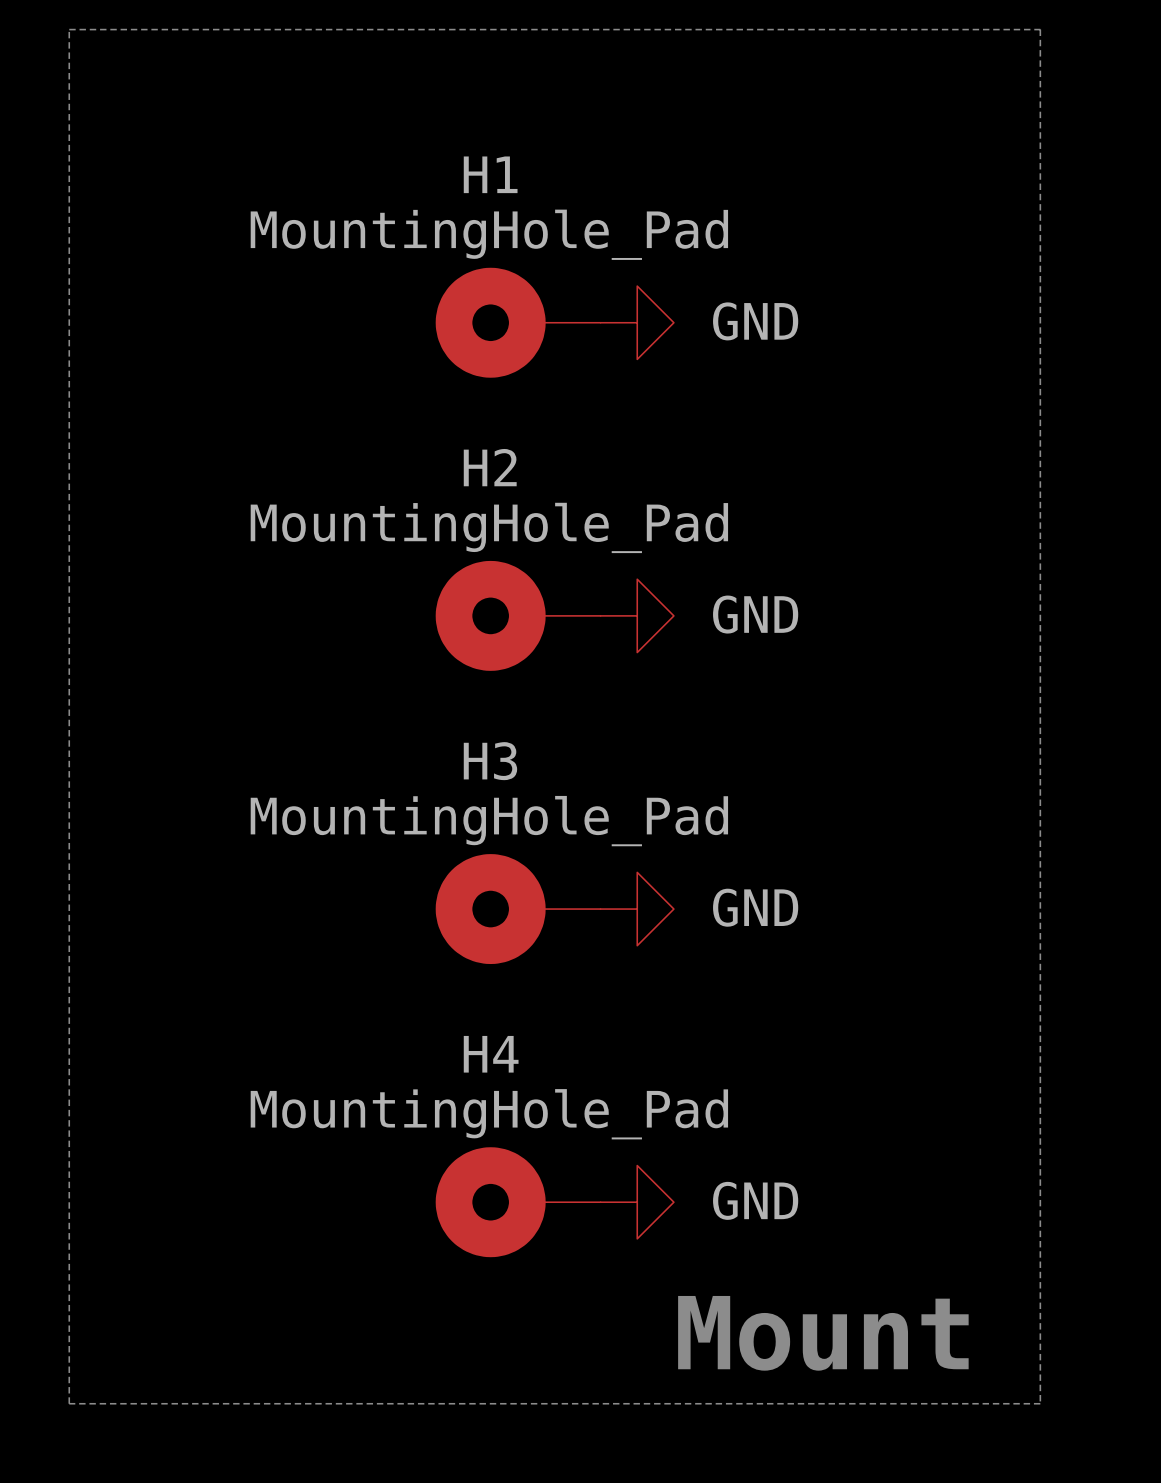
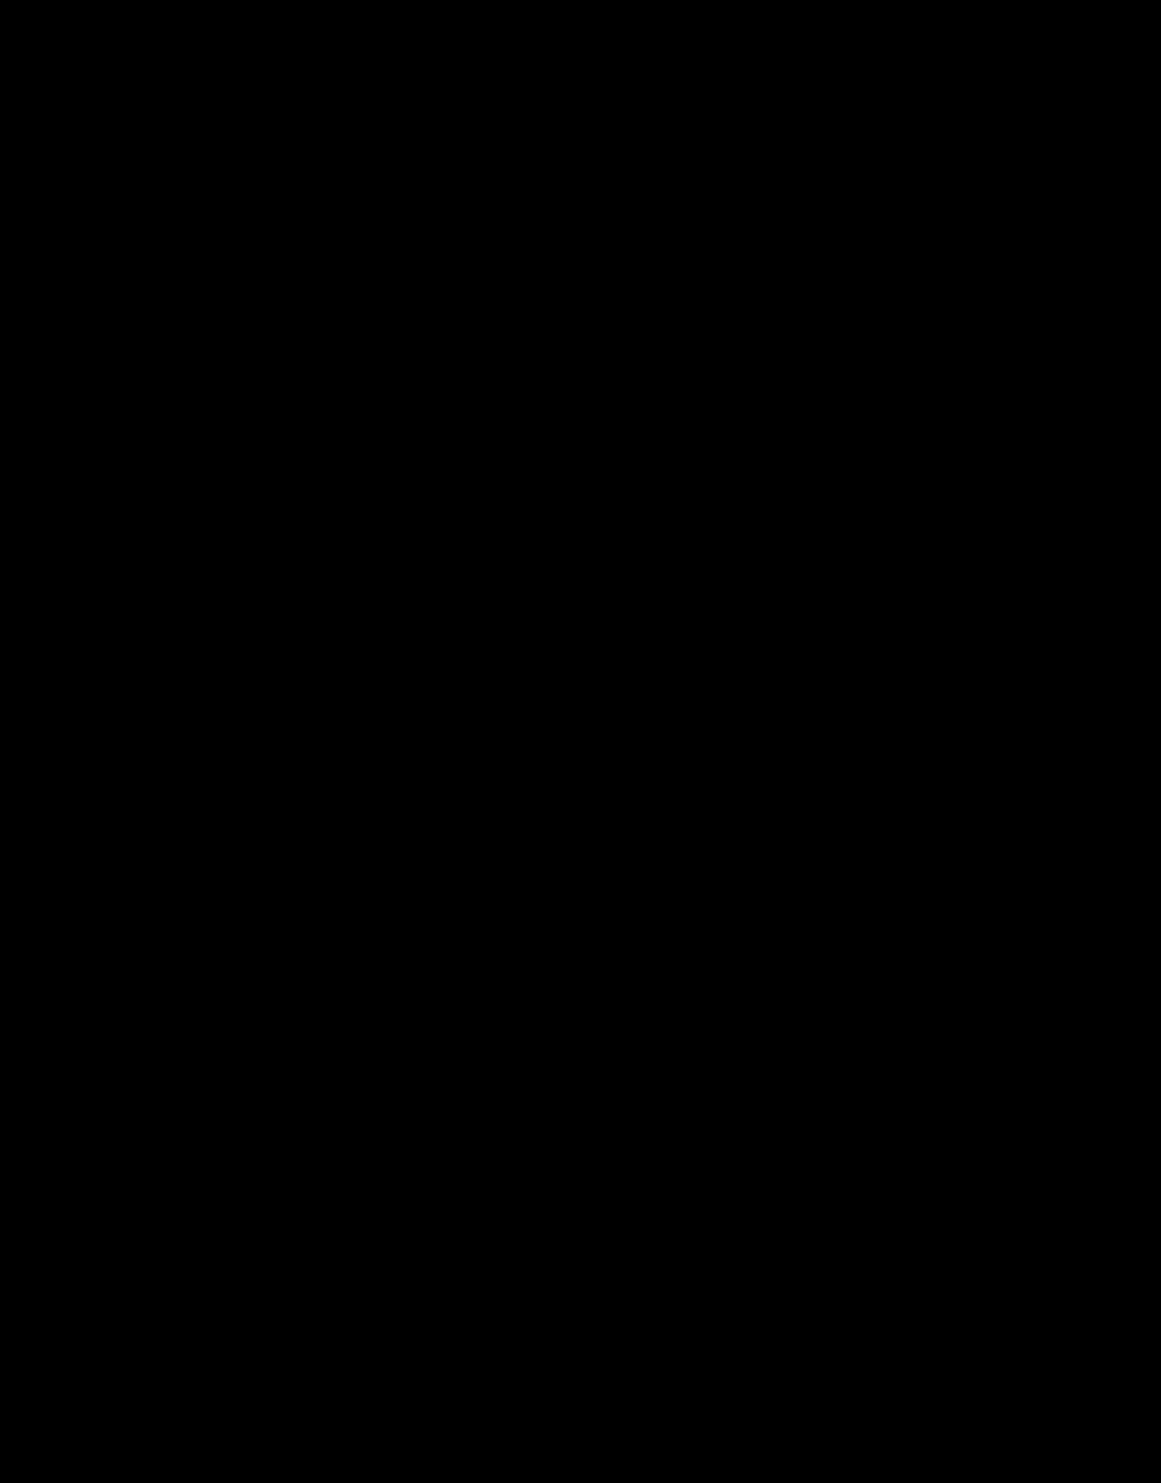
line: (69, 29) (1040, 29) (1040, 1403) (69, 1403) (69, 29) -> none
H1: MountingHole_Pad (518, 322) -> none
power symbol: GND (637, 322) -> none
H2: MountingHole_Pad (518, 615) -> none
power symbol: GND (637, 615) -> none
H3: MountingHole_Pad (518, 909) -> none
power symbol: GND (637, 909) -> none
H4: MountingHole_Pad (518, 1202) -> none
power symbol: GND (637, 1202) -> none
text: Mount (823, 1333) -> none

